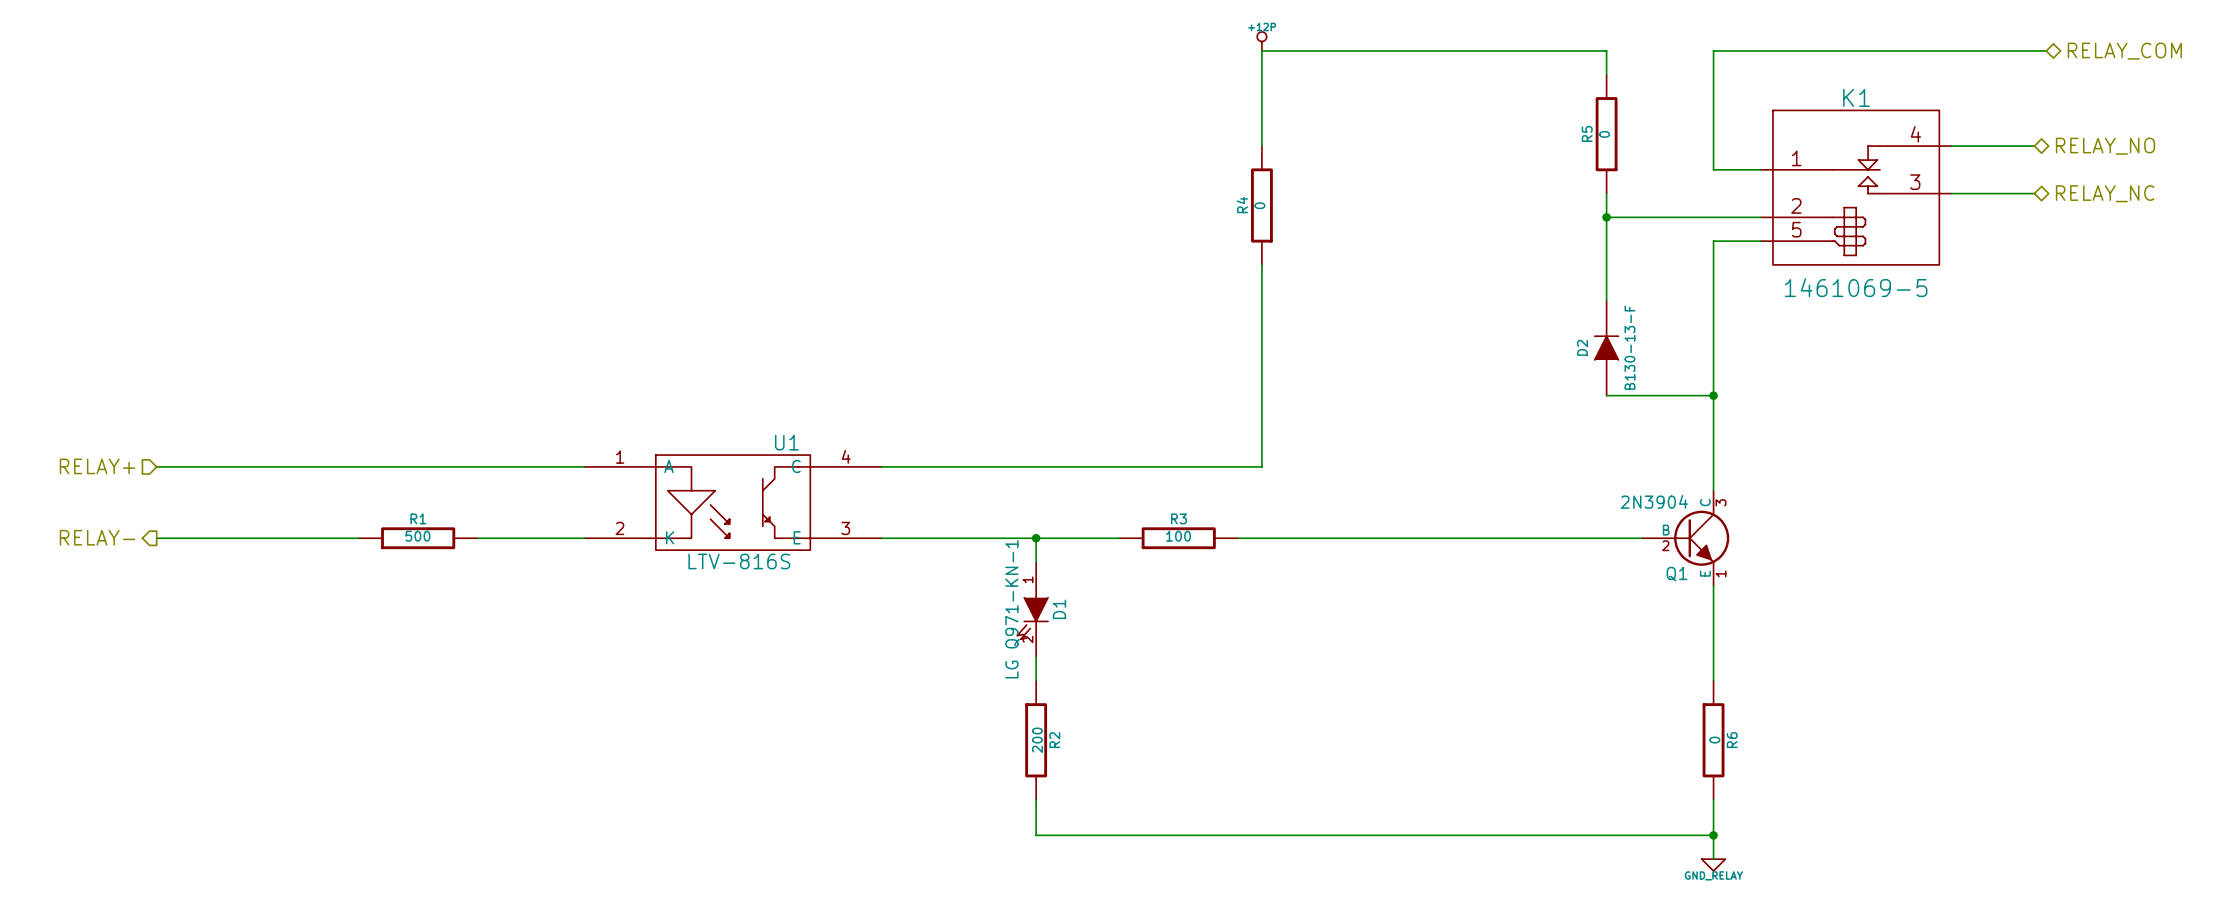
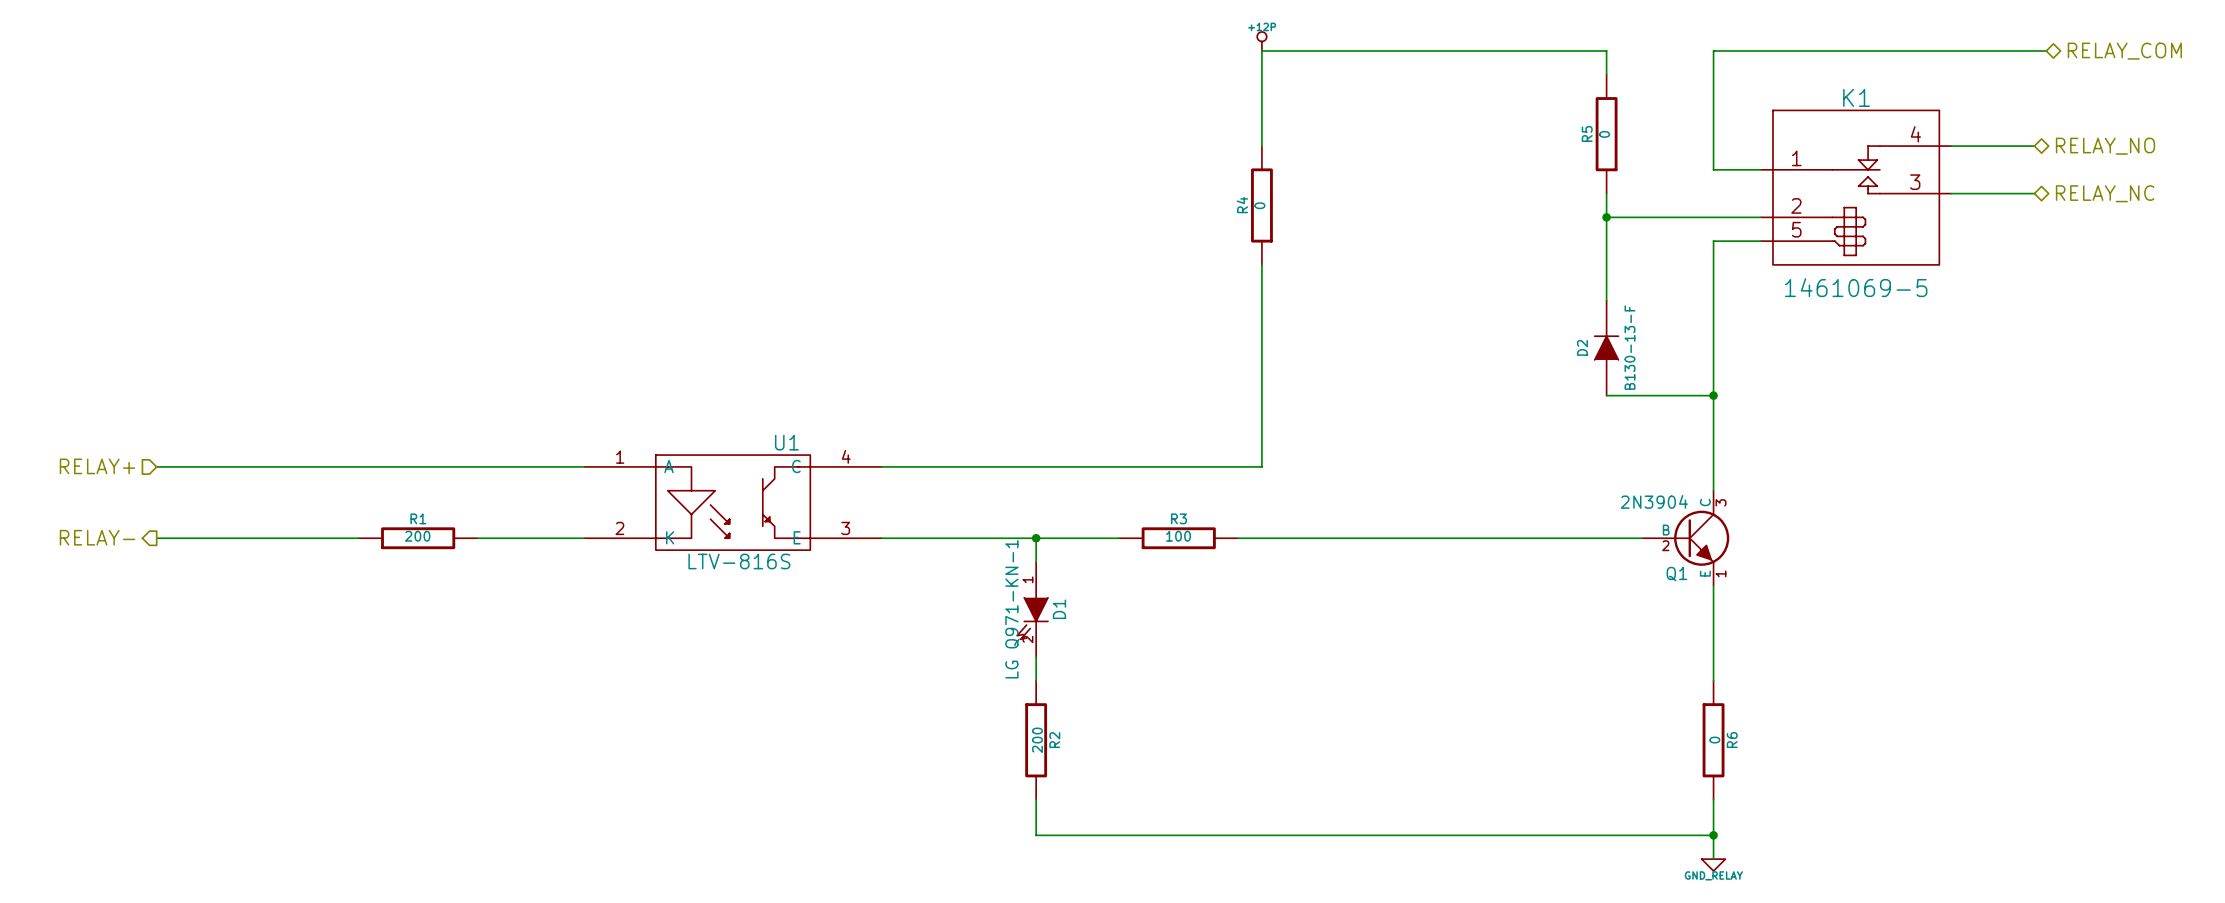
R1 value: 500 (417, 536) -> 200 (417, 536)

